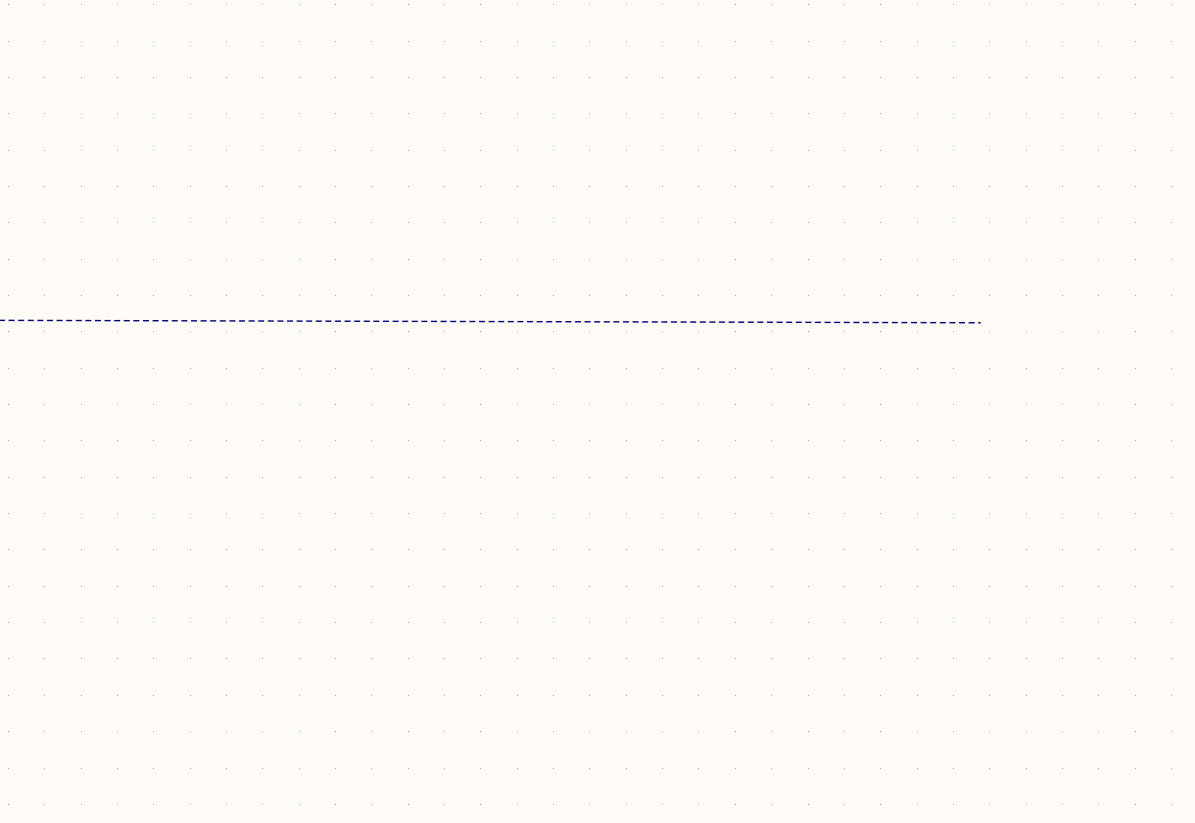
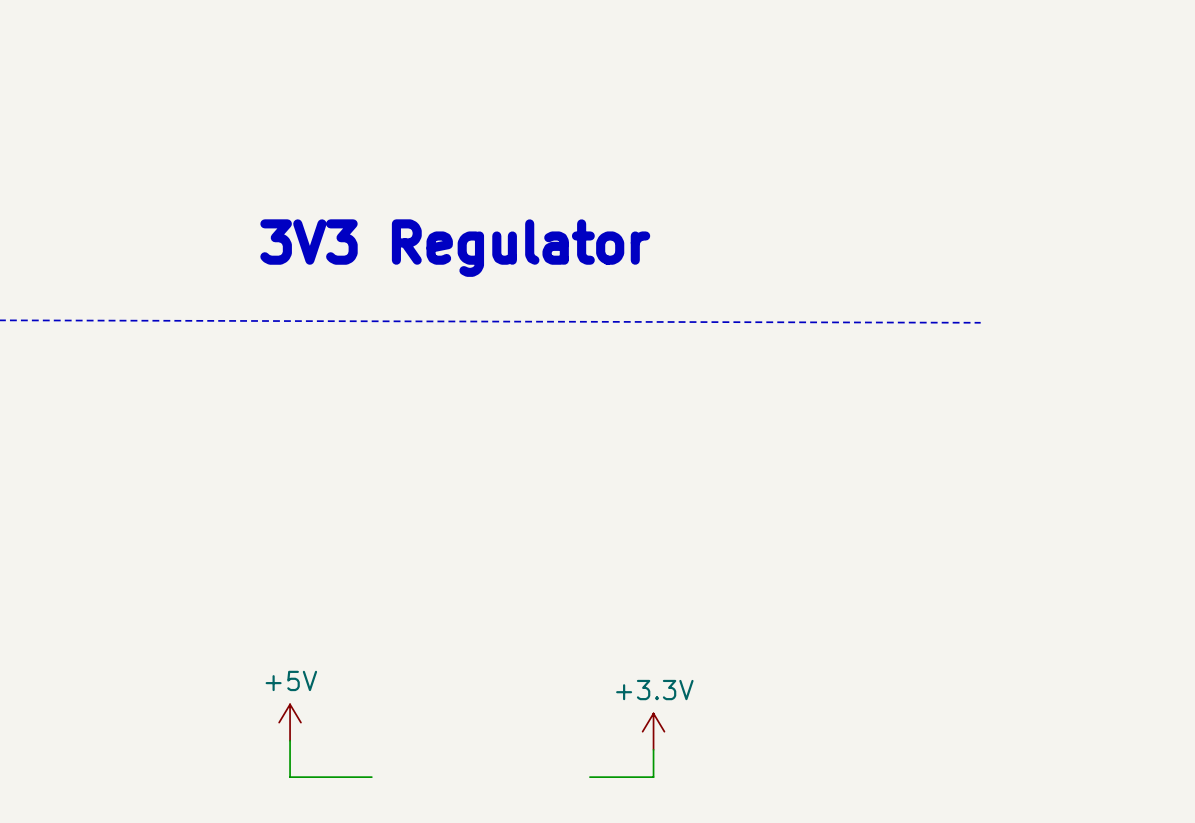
text: none -> 3V3 Regulator (455, 248)
power symbol: none -> +5V (290, 722)
power symbol: none -> +3.3V (653, 731)
wire: none -> (290, 740) (290, 777) (371, 777)
wire: none -> (653, 749) (653, 777) (589, 777)

